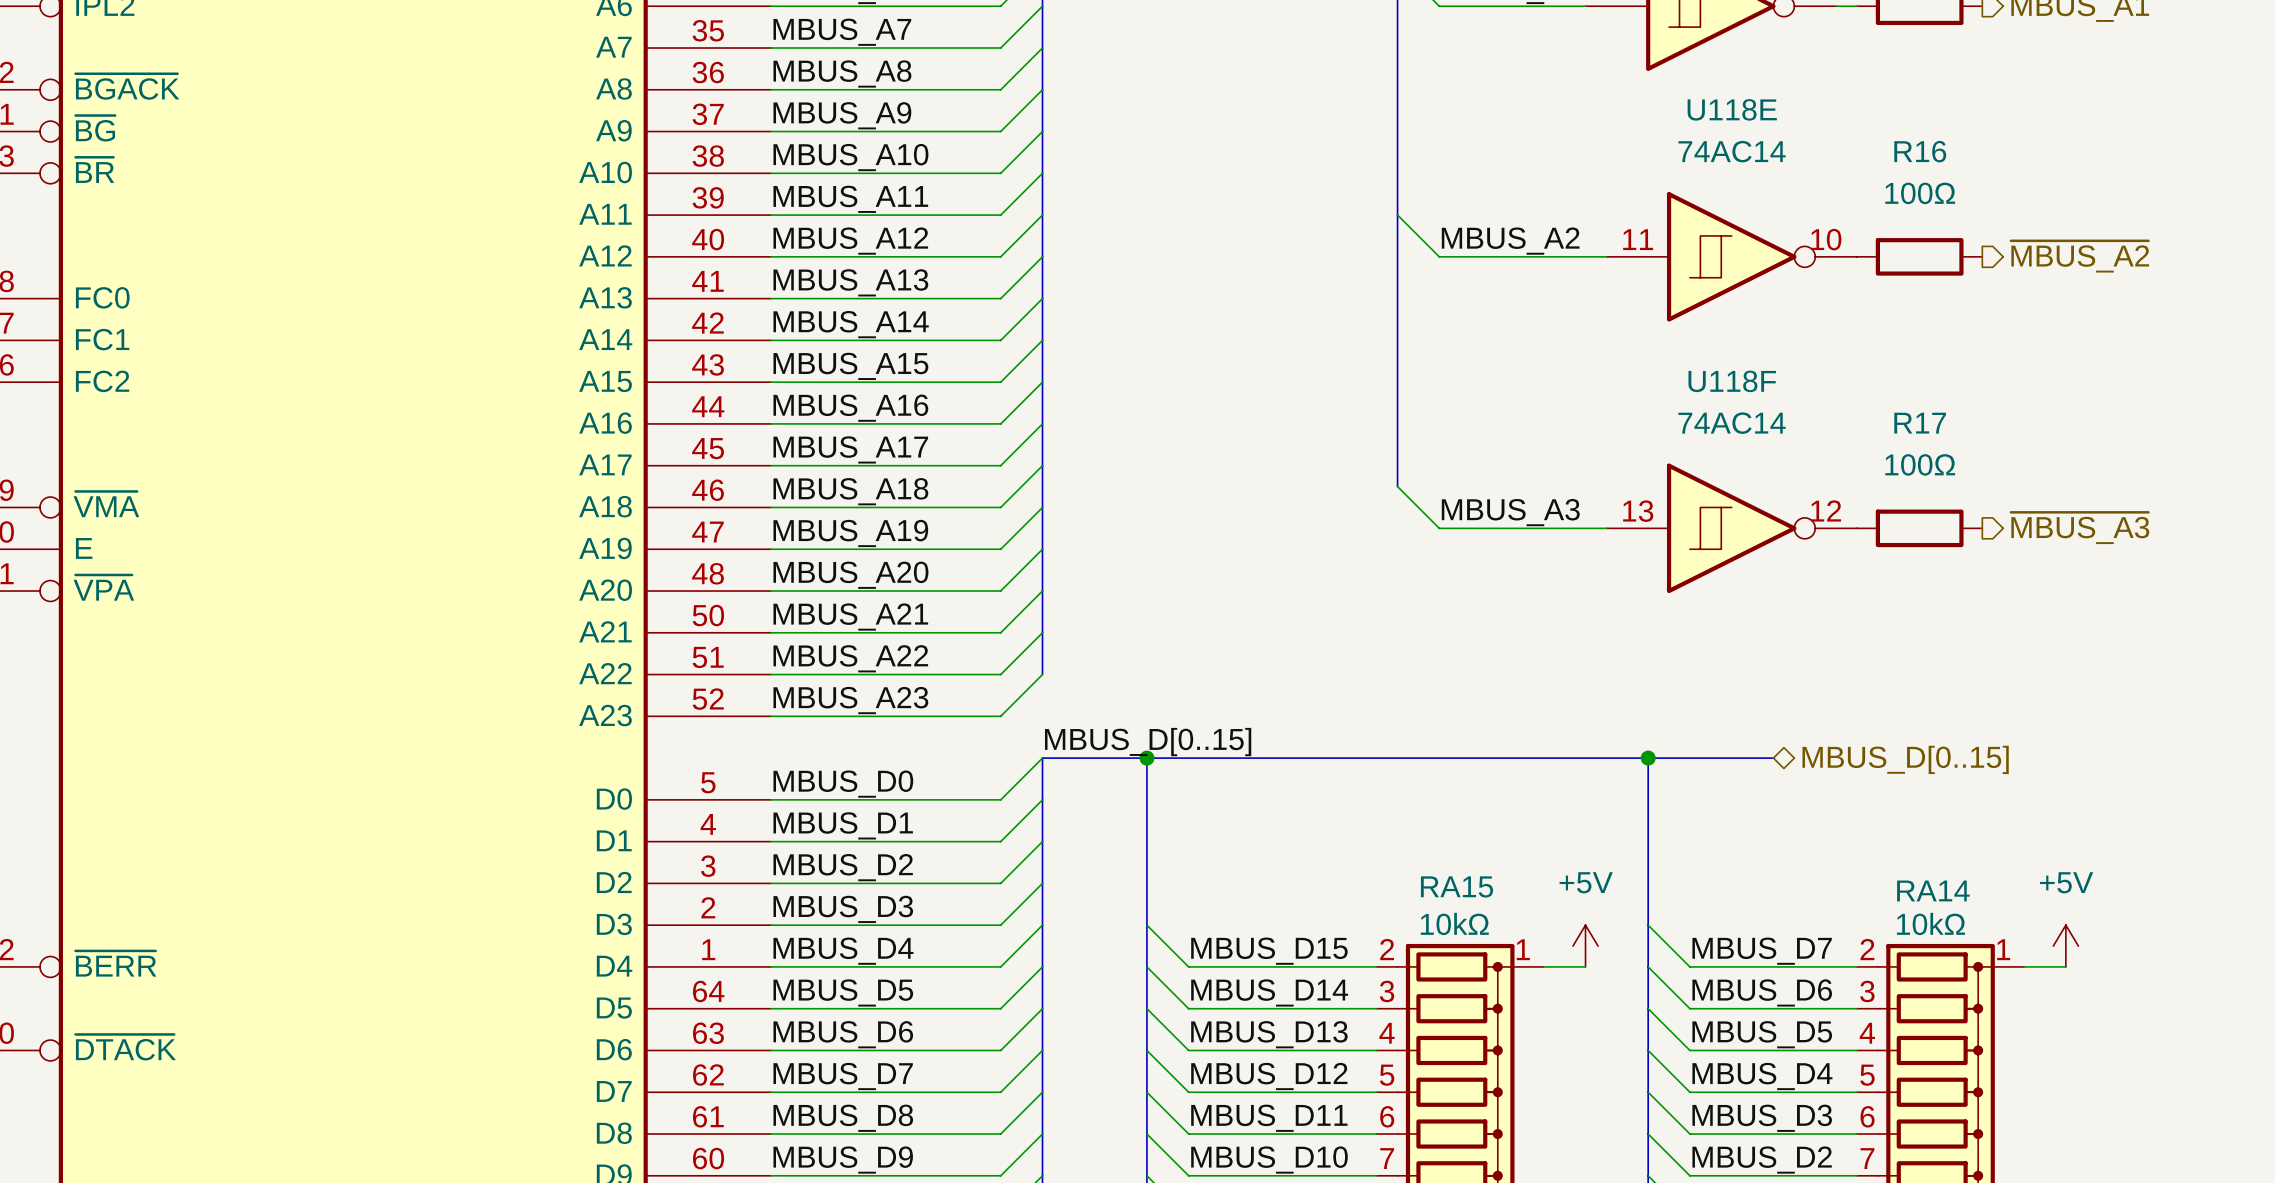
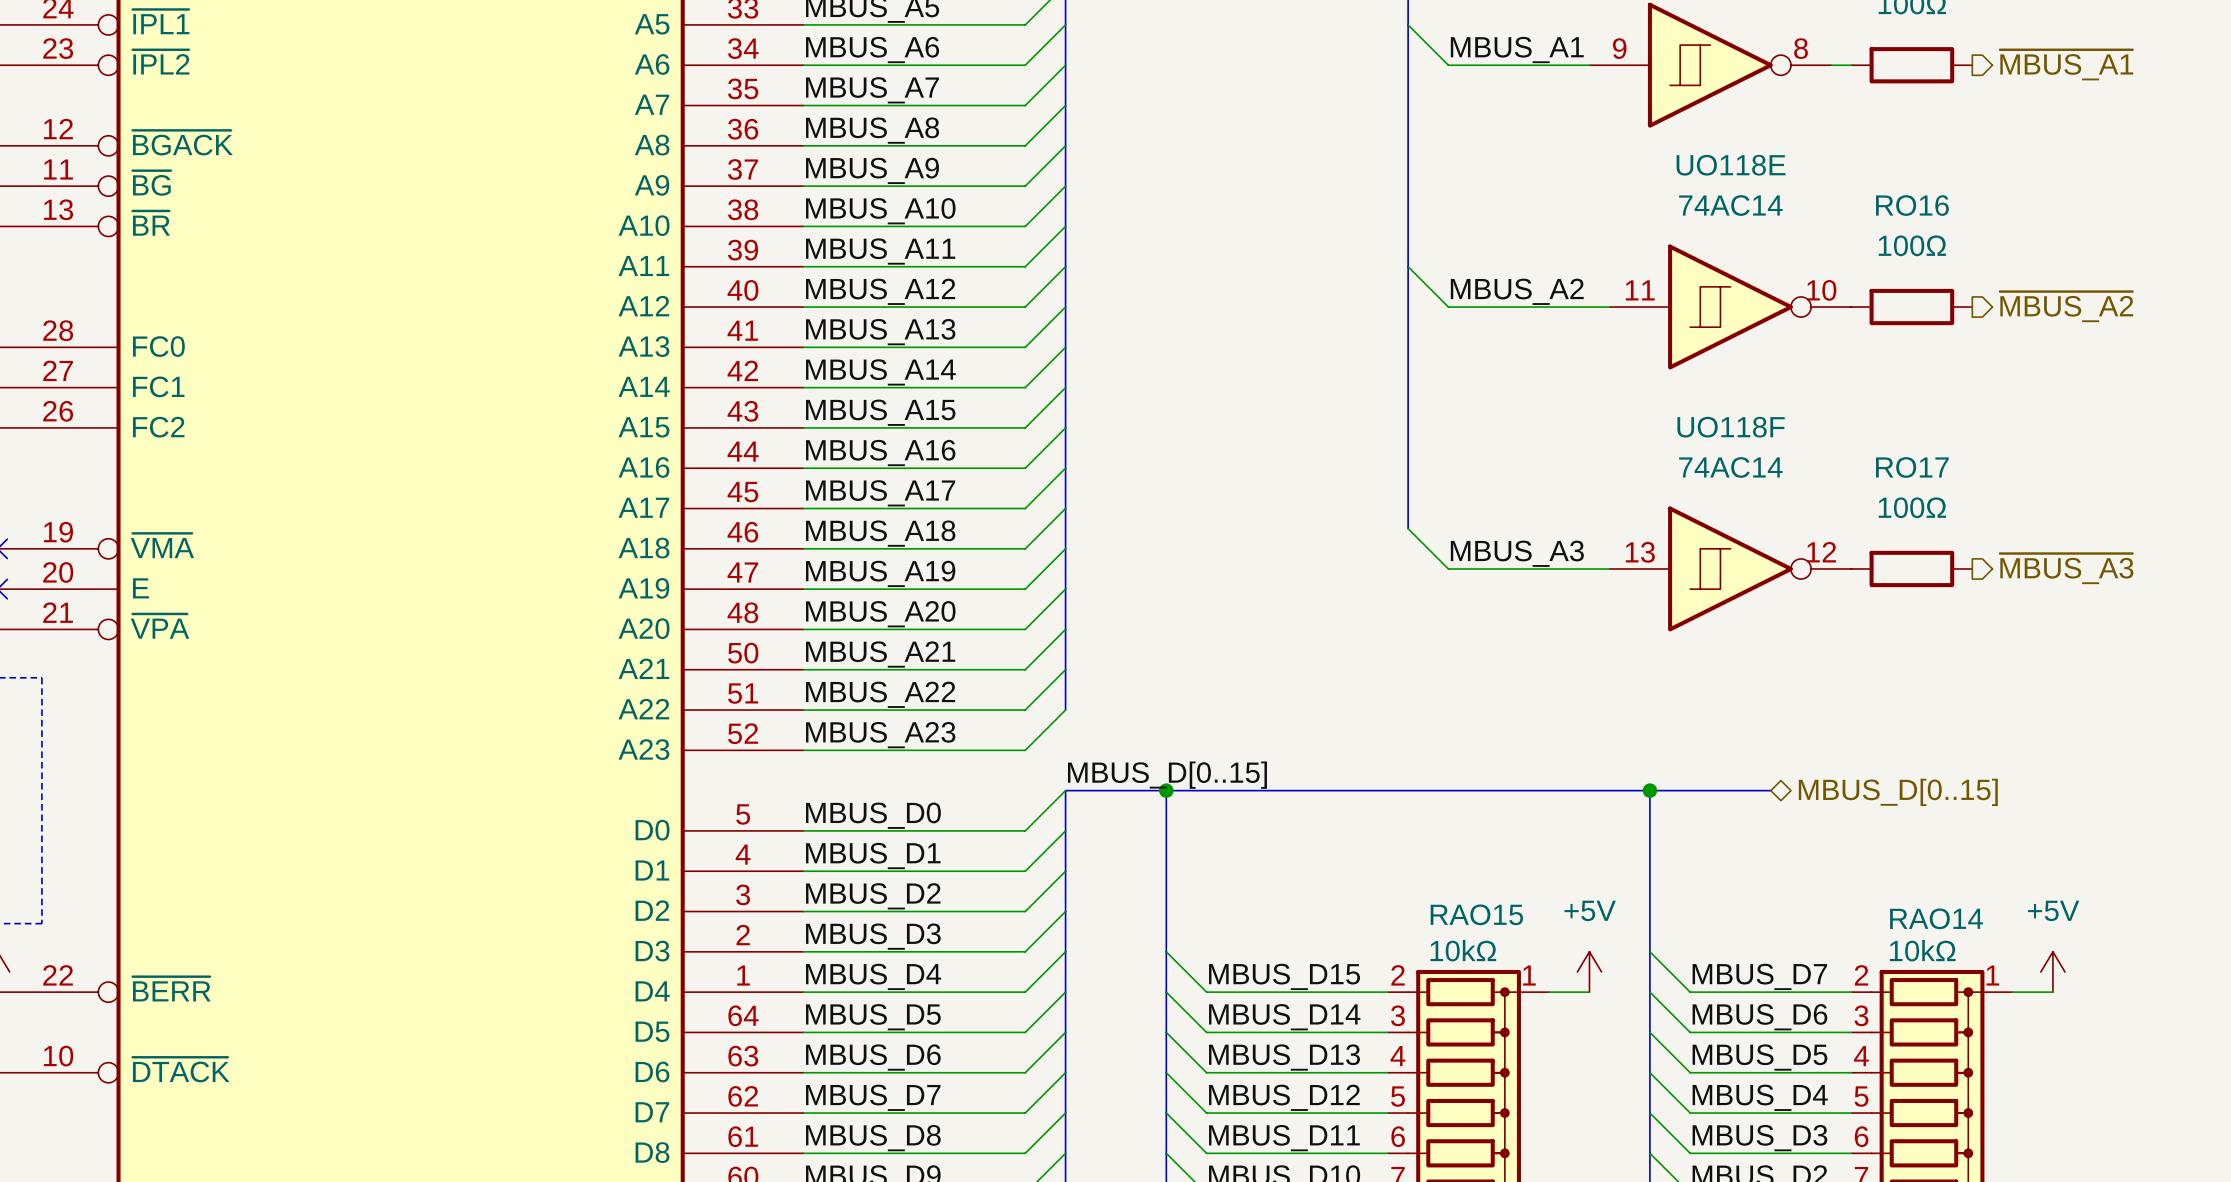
U118E name: U118E (1732, 109) -> UO118E (1731, 165)
R16 name: R16 (1920, 151) -> RO16 (1912, 205)
U118F name: U118F (1732, 381) -> UO118F (1731, 427)
R17 name: R17 (1920, 423) -> RO17 (1912, 467)
RA15 name: RA15 (1457, 886) -> RAO15 (1476, 914)
RA14 name: RA14 (1933, 890) -> RAO14 (1936, 918)

